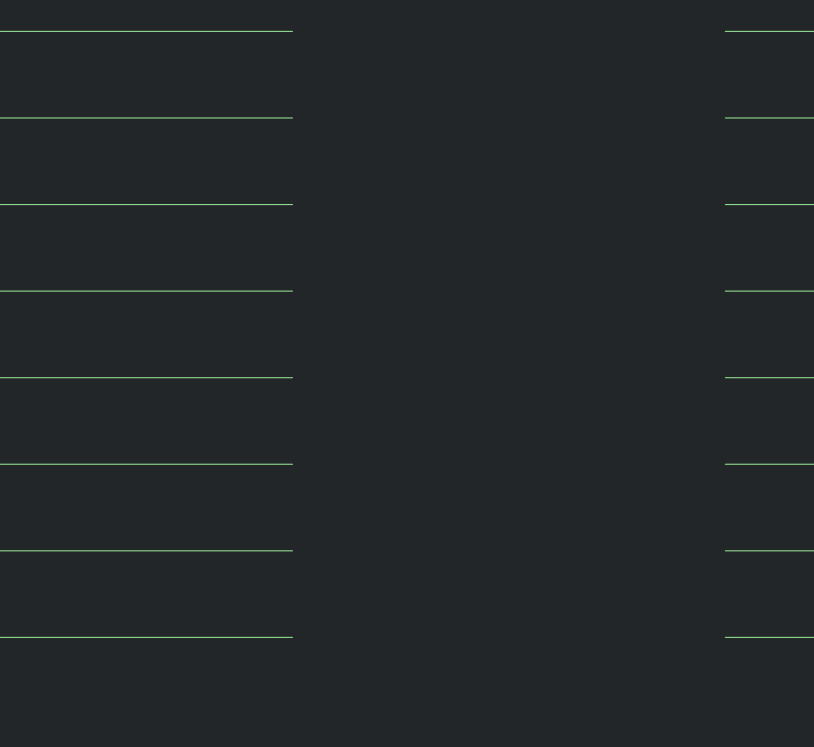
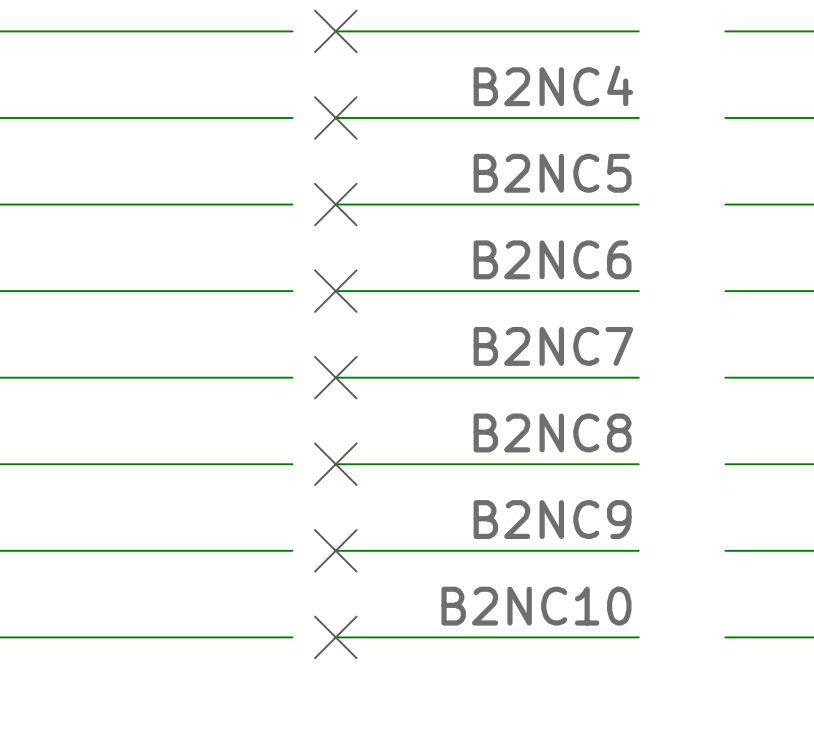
wire: none -> (335, 31) (638, 31)
no-connect mark: none -> (335, 31)
label: none -> B2NC4 (553, 85)
wire: none -> (335, 117) (638, 117)
no-connect mark: none -> (335, 117)
label: none -> B2NC5 (552, 173)
wire: none -> (335, 204) (638, 204)
no-connect mark: none -> (335, 204)
label: none -> B2NC6 (552, 259)
wire: none -> (335, 291) (638, 291)
no-connect mark: none -> (335, 291)
label: none -> B2NC7 (553, 346)
wire: none -> (335, 377) (638, 377)
no-connect mark: none -> (335, 377)
label: none -> B2NC8 (552, 432)
wire: none -> (335, 464) (638, 464)
no-connect mark: none -> (335, 464)
label: none -> B2NC9 (552, 519)
wire: none -> (335, 550) (638, 550)
no-connect mark: none -> (335, 550)
label: none -> B2NC10 (536, 606)
wire: none -> (335, 637) (638, 637)
no-connect mark: none -> (335, 637)

